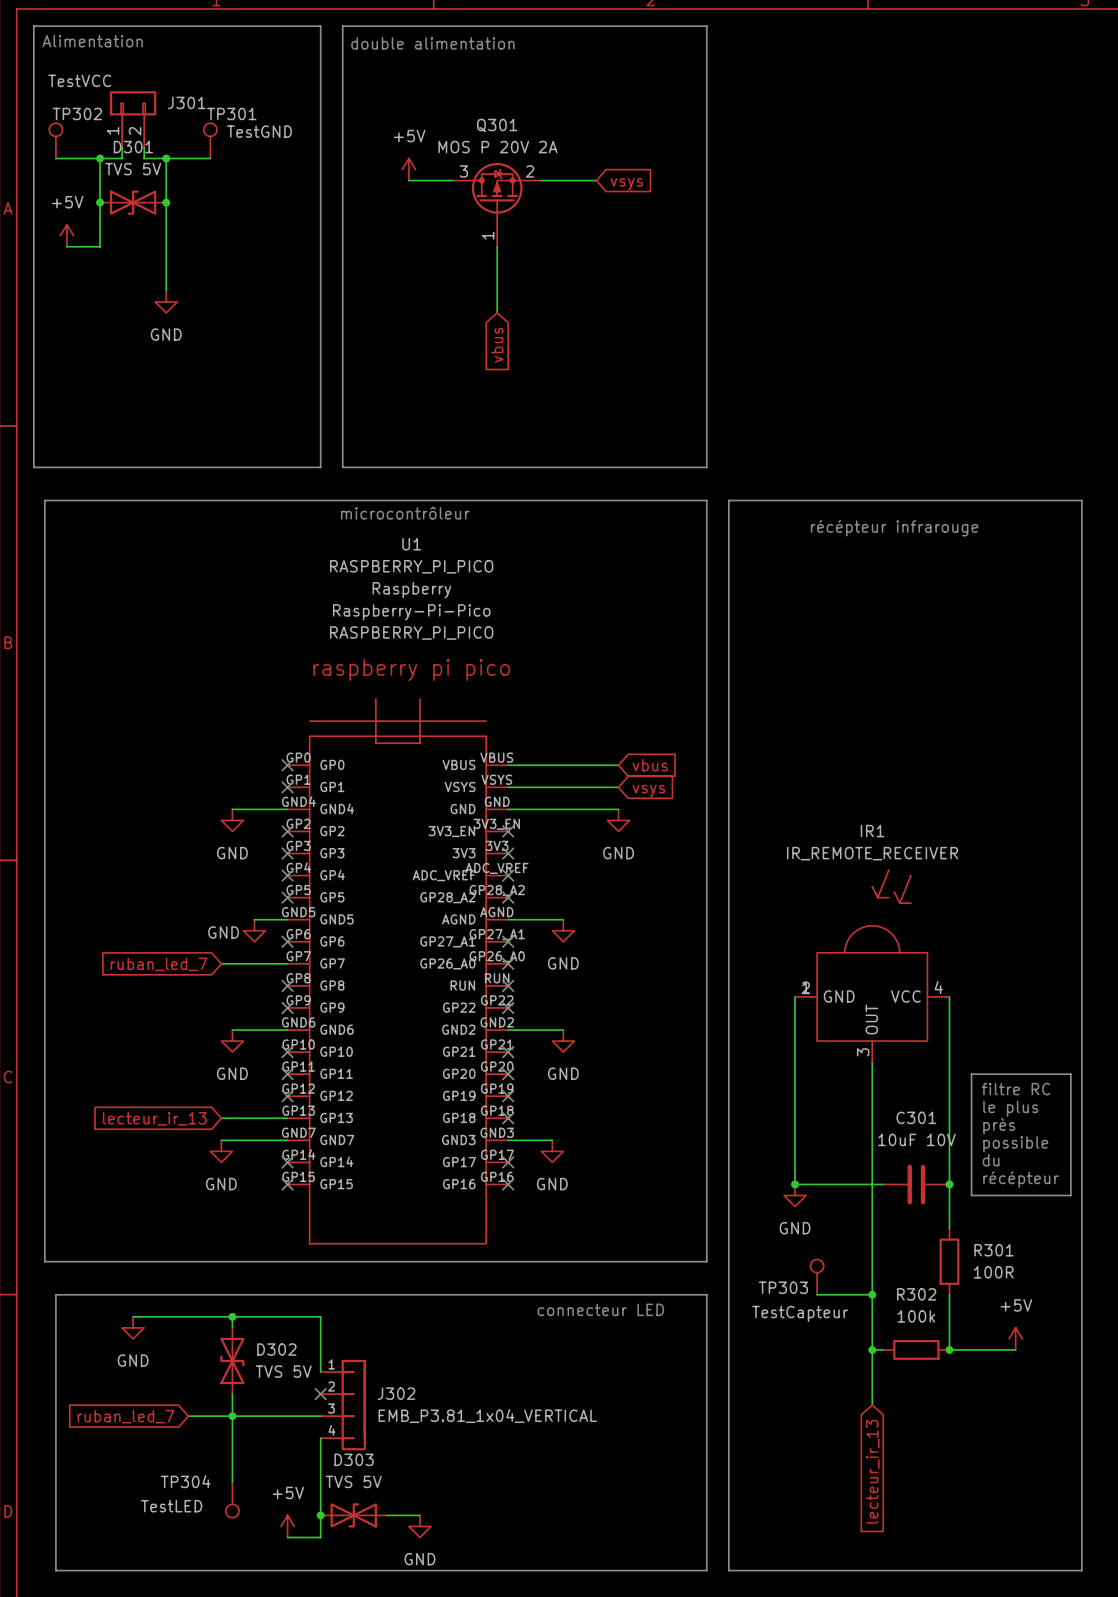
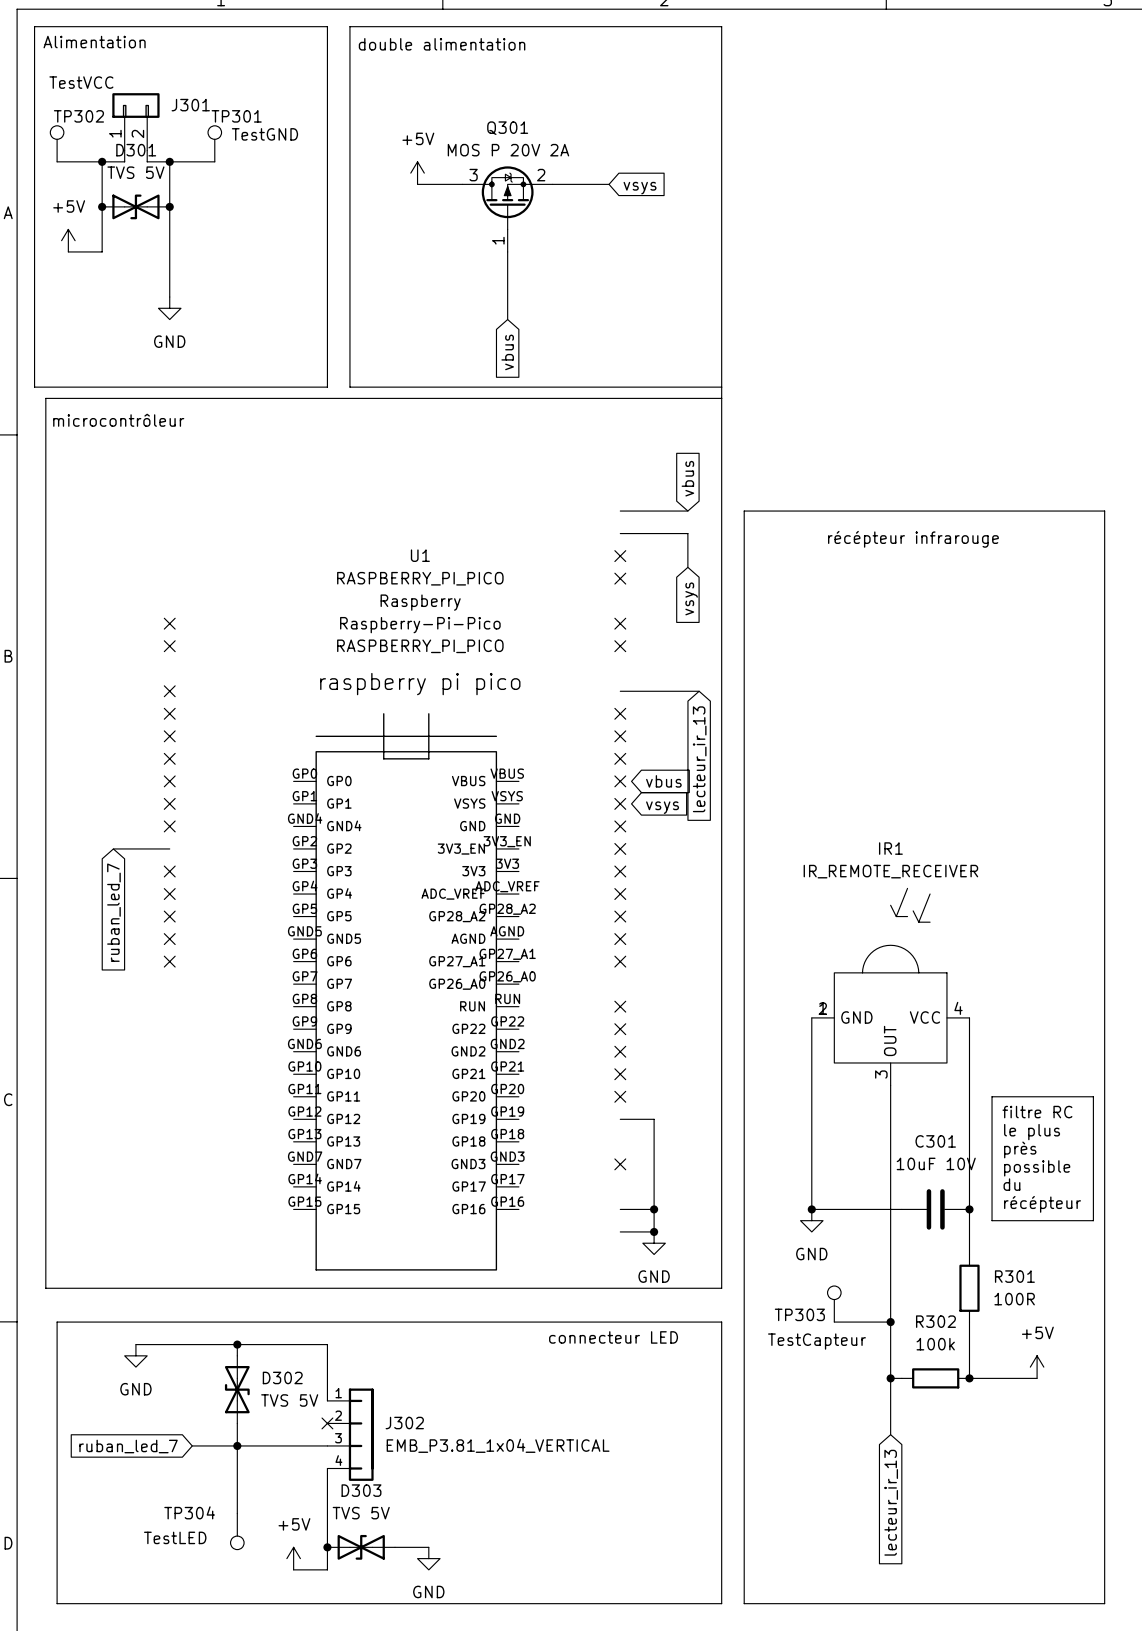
line: (33, 379) (33, 467) (320, 467) (320, 379) -> (34, 387) (327, 387)
line: (342, 379) (342, 467) (706, 467) -> (349, 387) (721, 387)
text: none -> microcontrôleur (118, 420)
line: none -> (721, 477) (721, 511)
global label: none -> vbus (687, 478)
line: (44, 500) (706, 500) -> (45, 511) (45, 398) (721, 398)
text: microcontrôleur (405, 513) -> none
wire: none -> (620, 533) (687, 533) (687, 567)
no-connect mark: none -> (620, 556)
no-connect mark: none -> (620, 578)
global label: none -> vsys (691, 598)
no-connect mark: none -> (169, 623)
no-connect mark: none -> (620, 623)
no-connect mark: none -> (169, 646)
no-connect mark: none -> (620, 646)
no-connect mark: none -> (169, 691)
wire: none -> (620, 691) (699, 691)
no-connect mark: none -> (169, 713)
no-connect mark: none -> (620, 713)
no-connect mark: none -> (169, 736)
no-connect mark: none -> (620, 736)
no-connect mark: none -> (169, 758)
no-connect mark: none -> (620, 758)
global label: none -> lecteur_ir_13 (699, 759)
no-connect mark: none -> (169, 781)
no-connect mark: (287, 765) -> none
wire: (508, 765) (618, 765) -> none
no-connect mark: none -> (620, 781)
no-connect mark: none -> (169, 803)
no-connect mark: (287, 787) -> none
wire: (508, 787) (618, 787) -> none
no-connect mark: none -> (620, 803)
no-connect mark: none -> (169, 826)
wire: (232, 809) (287, 809) -> (113, 848) (169, 848)
wire: (508, 809) (618, 809) -> none
no-connect mark: none -> (620, 826)
power symbol: GND (232, 820) -> none
power symbol: GND (618, 820) -> none
no-connect mark: (287, 831) -> none
no-connect mark: (508, 831) -> none
no-connect mark: none -> (620, 848)
no-connect mark: none -> (169, 871)
no-connect mark: (287, 853) -> none
no-connect mark: (508, 853) -> none
no-connect mark: none -> (620, 871)
no-connect mark: none -> (169, 894)
no-connect mark: (287, 875) -> none
no-connect mark: (508, 875) -> none
no-connect mark: none -> (620, 894)
no-connect mark: none -> (169, 916)
no-connect mark: (287, 897) -> none
no-connect mark: (508, 897) -> none
no-connect mark: none -> (620, 916)
no-connect mark: none -> (169, 939)
wire: (254, 919) (287, 919) -> none
wire: (508, 919) (563, 919) -> none
no-connect mark: none -> (620, 939)
power symbol: GND (254, 930) -> none
power symbol: GND (563, 930) -> none
no-connect mark: none -> (169, 961)
no-connect mark: (287, 941) -> none
no-connect mark: (508, 941) -> none
no-connect mark: none -> (620, 961)
wire: (221, 963) (287, 963) -> none
no-connect mark: (508, 963) -> none
global label rotation: 0° (158, 964) -> 90° counterclockwise (113, 912)
no-connect mark: (287, 985) -> none
no-connect mark: (508, 985) -> none
no-connect mark: none -> (620, 1006)
no-connect mark: (287, 1007) -> none
no-connect mark: (508, 1007) -> none
no-connect mark: none -> (620, 1029)
wire: (232, 1030) (287, 1030) -> none
wire: (508, 1030) (563, 1030) -> none
no-connect mark: none -> (620, 1051)
power symbol: GND (232, 1041) -> none
power symbol: GND (563, 1041) -> none
no-connect mark: (287, 1052) -> none
no-connect mark: (508, 1052) -> none
no-connect mark: none -> (620, 1074)
no-connect mark: (287, 1074) -> none
no-connect mark: (508, 1074) -> none
no-connect mark: none -> (620, 1096)
no-connect mark: (287, 1096) -> none
no-connect mark: (508, 1096) -> none
wire: none -> (620, 1119) (654, 1119) (654, 1231) (620, 1231)
global label: lecteur_ir_13 (154, 1118) -> none
wire: (221, 1118) (287, 1118) -> none
no-connect mark: (508, 1118) -> none
wire: (221, 1140) (287, 1140) -> none
wire: (508, 1140) (552, 1140) -> none
no-connect mark: none -> (620, 1164)
power symbol: GND (221, 1151) -> none
power symbol: GND (552, 1151) -> none
no-connect mark: (287, 1162) -> none
no-connect mark: (508, 1162) -> none
no-connect mark: (287, 1184) -> none
no-connect mark: (508, 1184) -> none
wire: none -> (620, 1209) (654, 1209)
junction: none -> (654, 1209)
junction: none -> (654, 1231)
power symbol: none -> GND (654, 1243)

